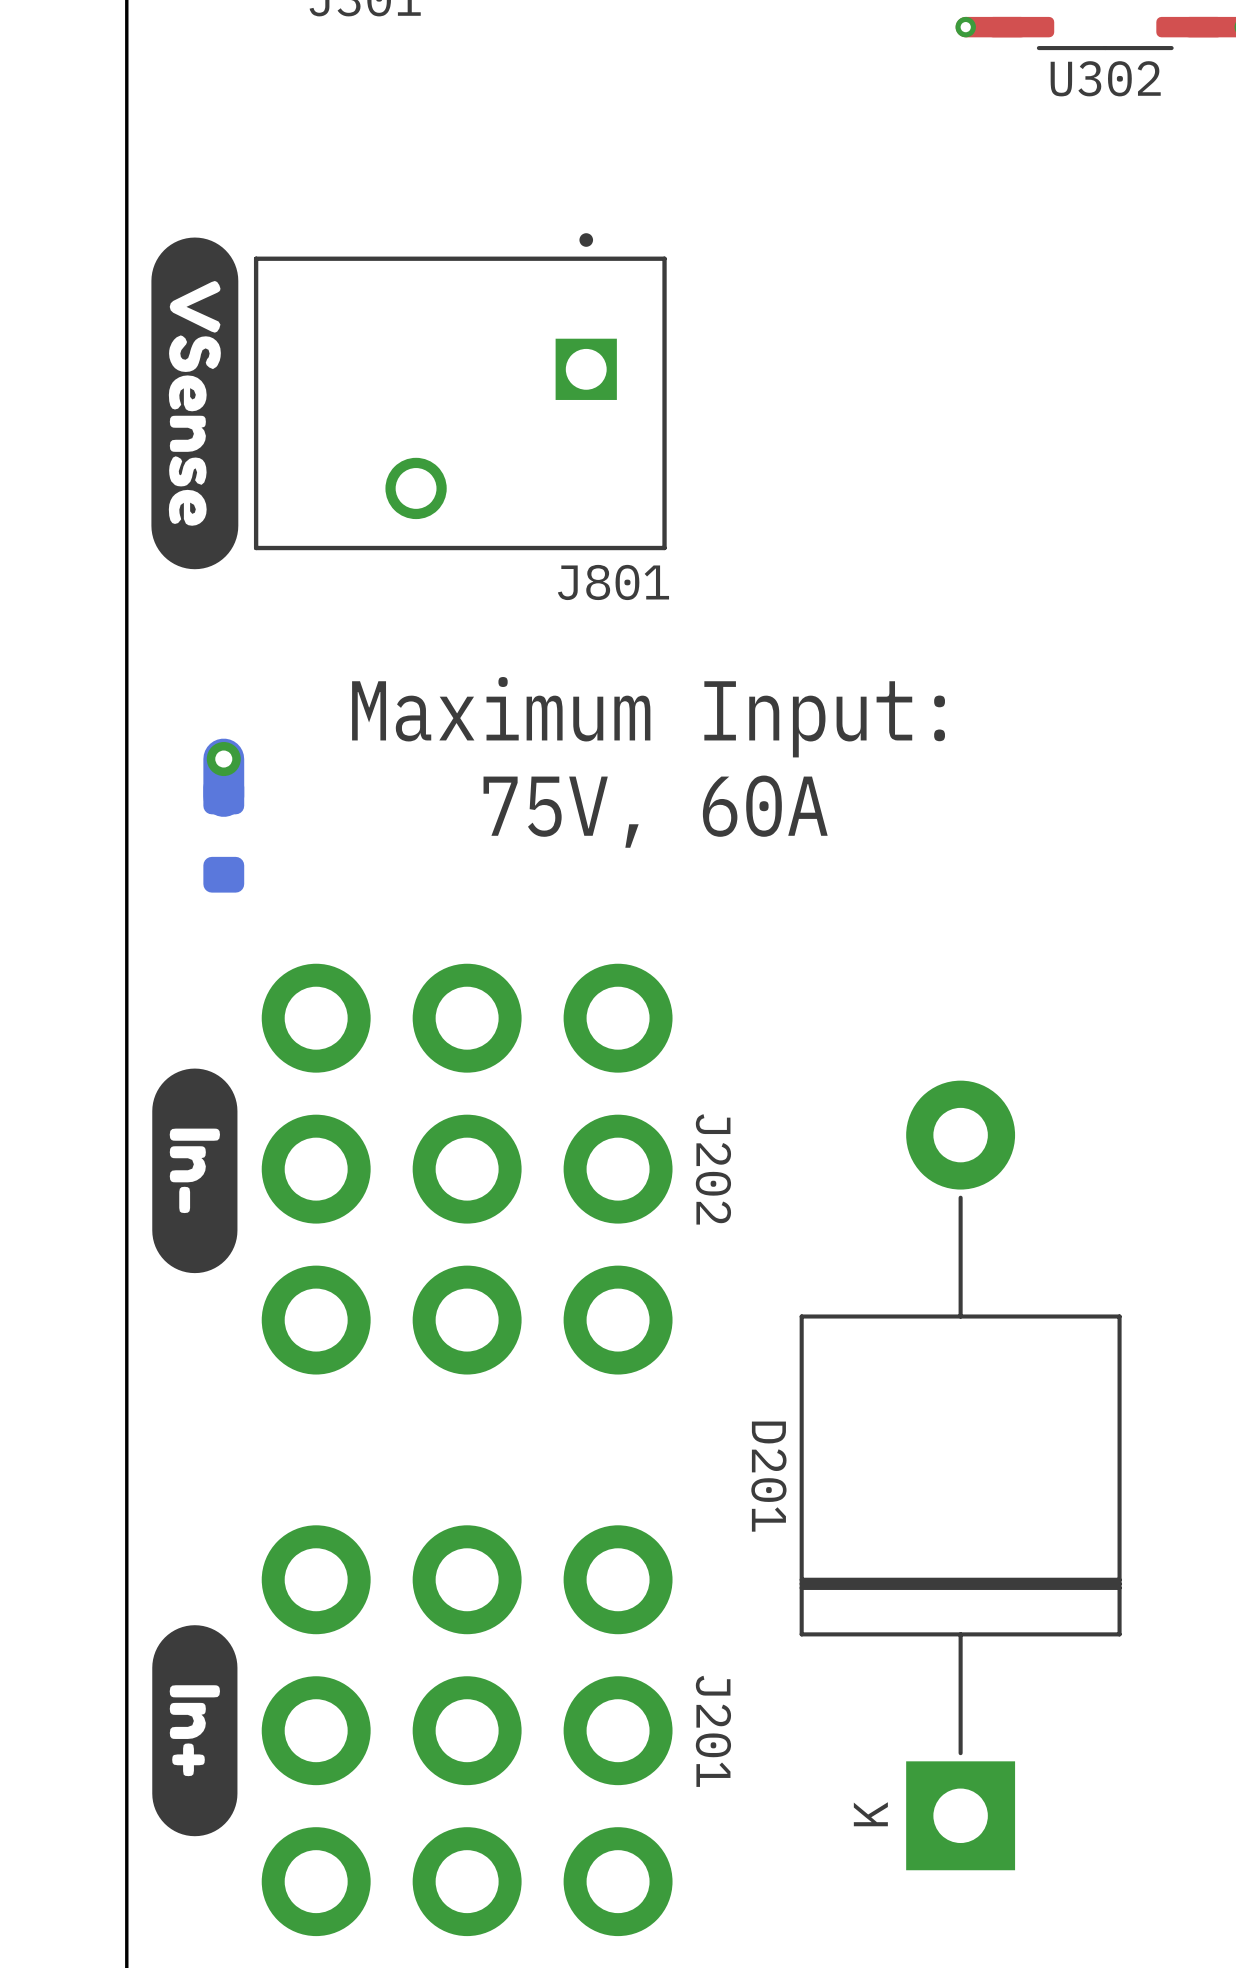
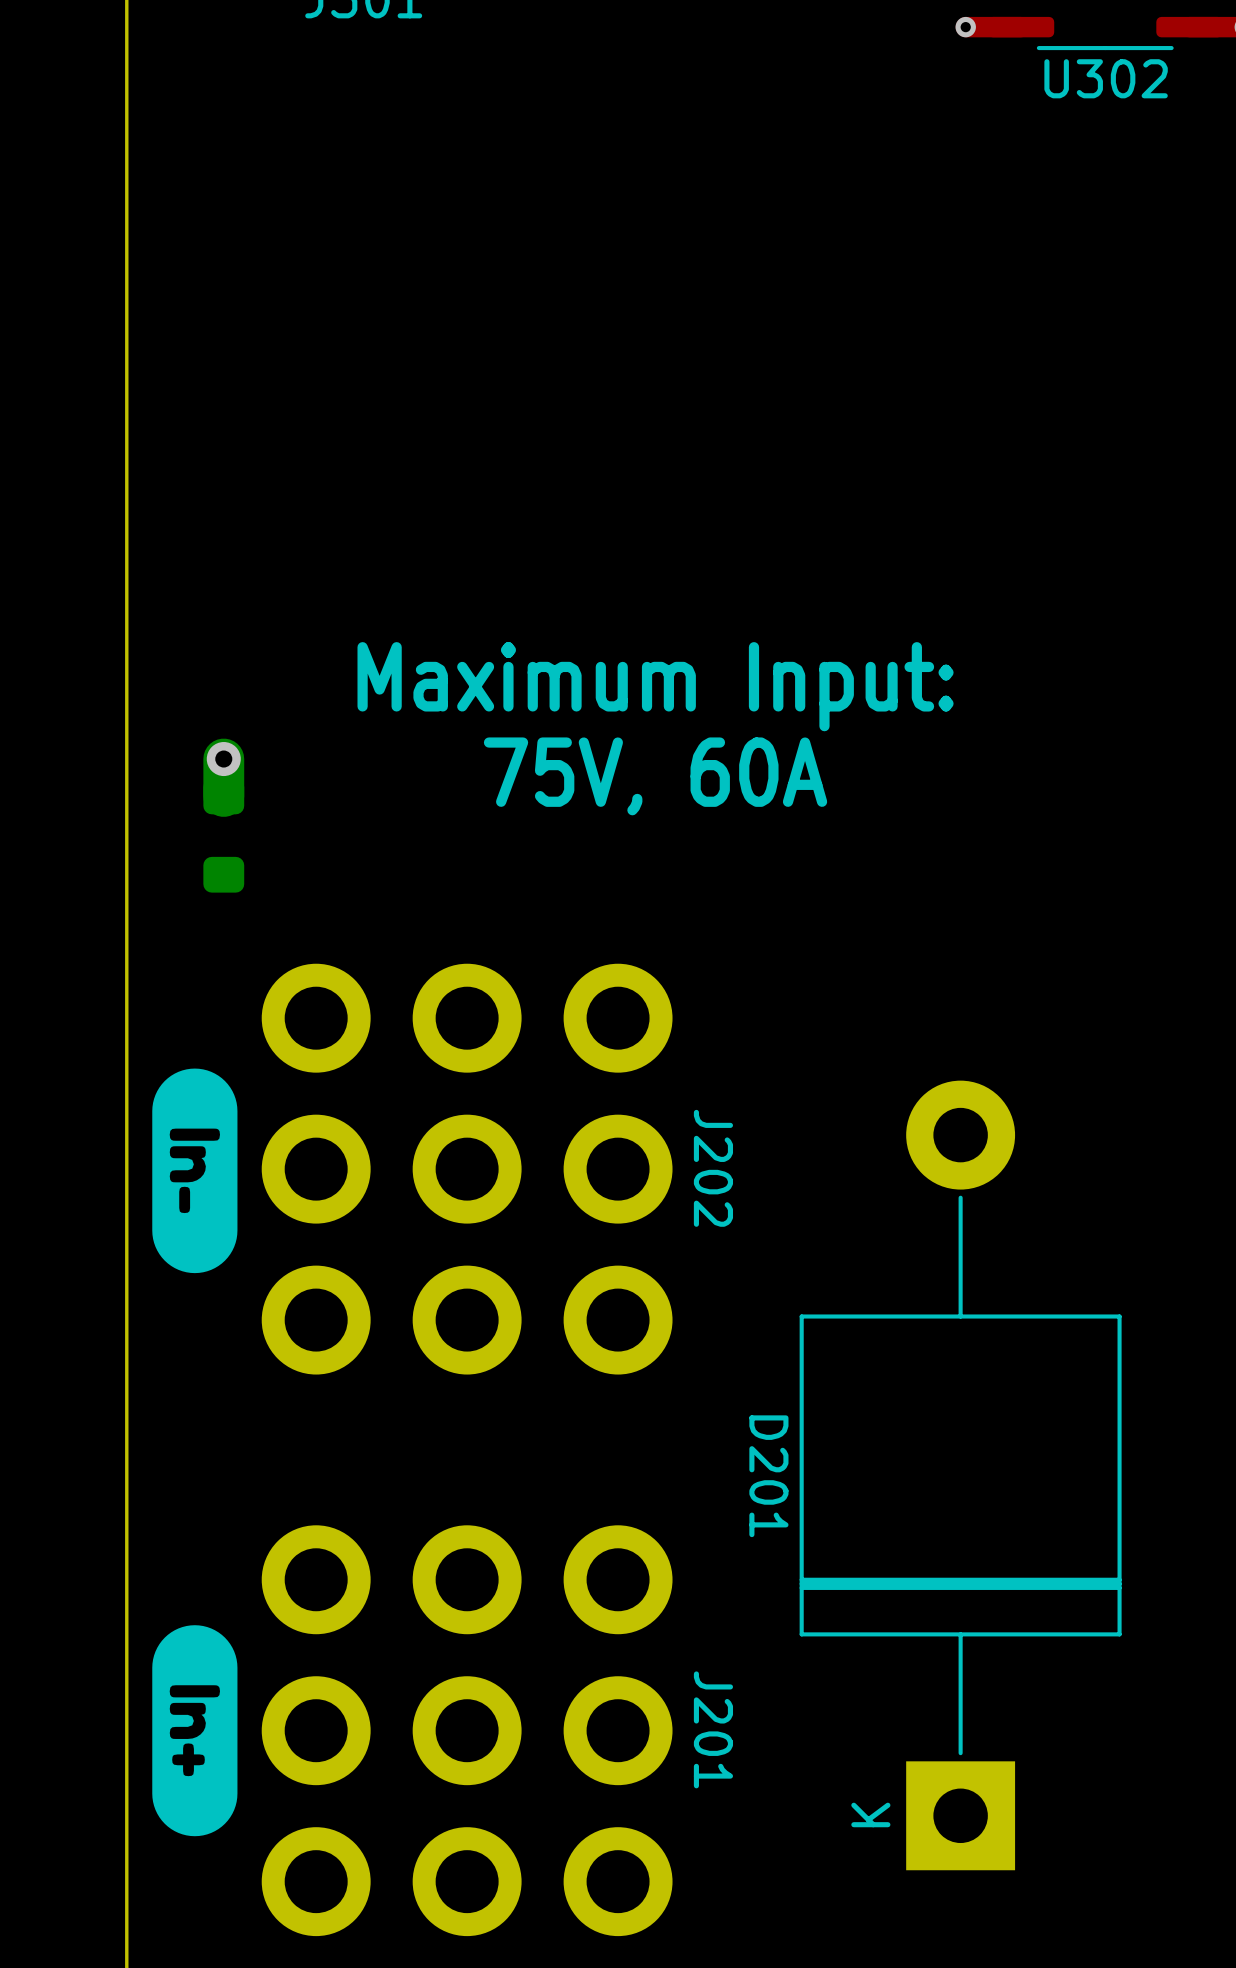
drawing: [151, 237, 239, 570] -> none
J801: (460, 391) -> none
text position: Maximum Input: (648, 717) -> Maximum Input: (655, 686)
text position: 75V, 60A (655, 811) -> 75V, 60A (655, 776)

